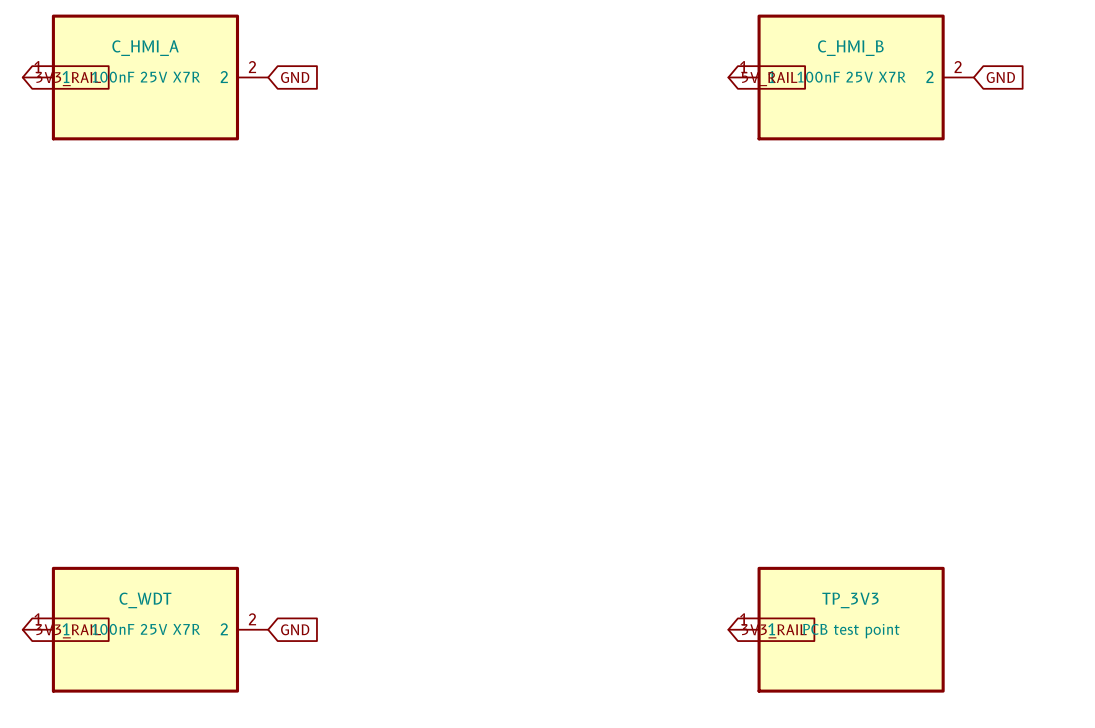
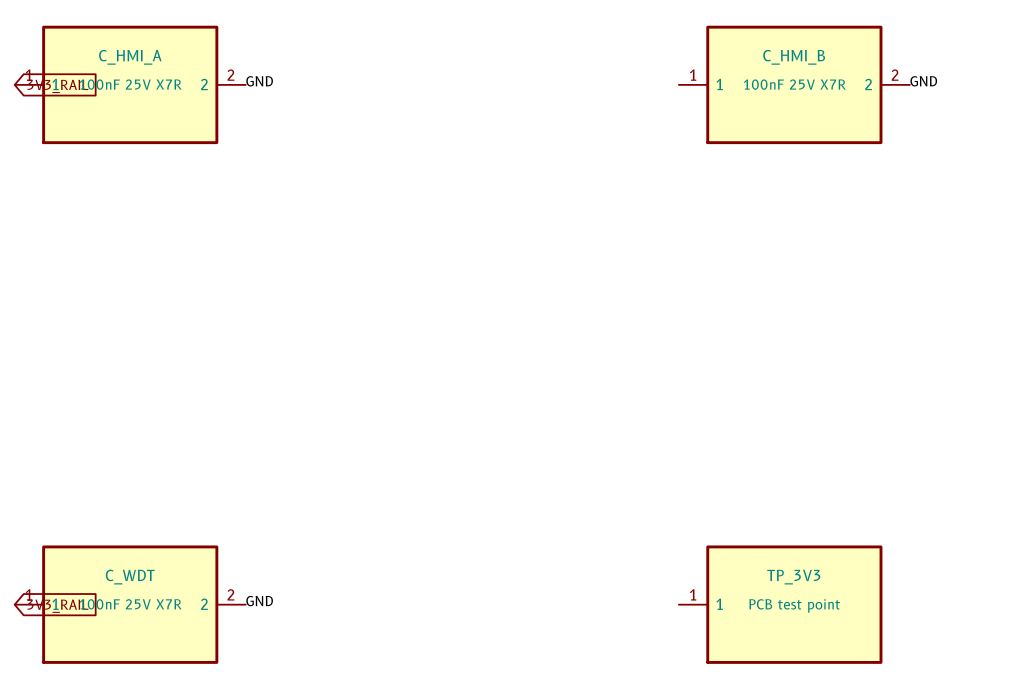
label: none -> GND (259, 81)
label: none -> GND (923, 81)
global label: GND (295, 77) -> none
global label: GND (1000, 77) -> none
global label: 5V_RAIL (769, 79) -> none
label: none -> GND (259, 601)
global label: GND (295, 629) -> none
global label: 3V3_RAIL (774, 631) -> none

